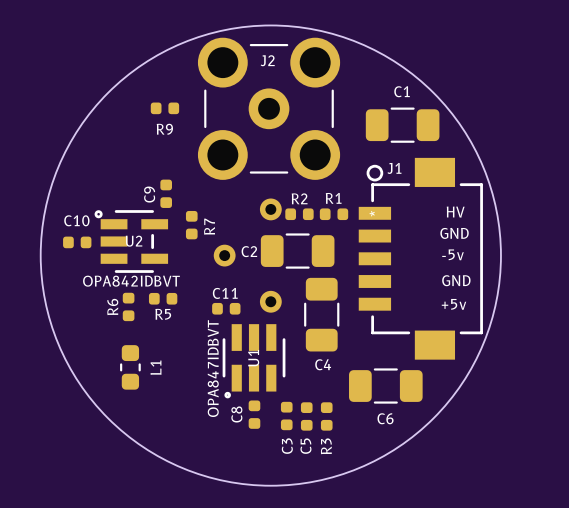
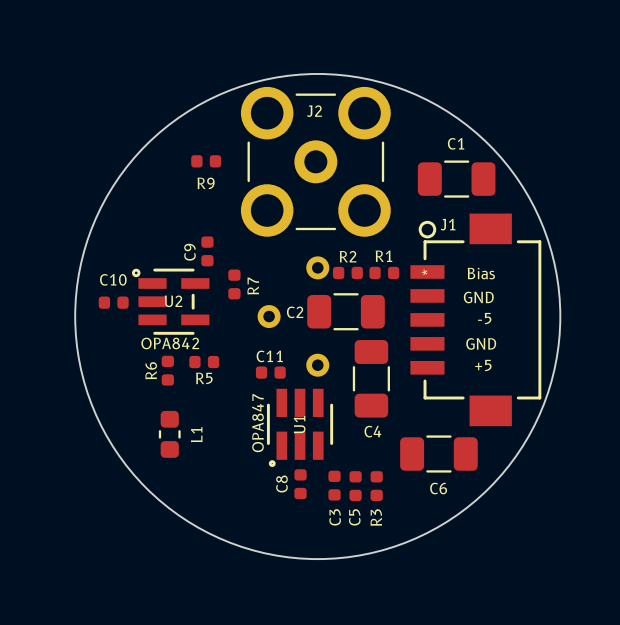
text: HV (455, 212) -> none
text: none -> Bias (481, 273)
text position: GND (454, 233) -> GND (478, 297)
text: -5v (453, 254) -> -5 (484, 318)
text position: GND (456, 280) -> GND (481, 343)
U2 value: OPA842IDBVT (131, 281) -> OPA842 (170, 343)
text: +5v (454, 304) -> +5 (483, 365)
U1 value: OPA847IDBVT (213, 368) -> OPA847 (258, 423)

